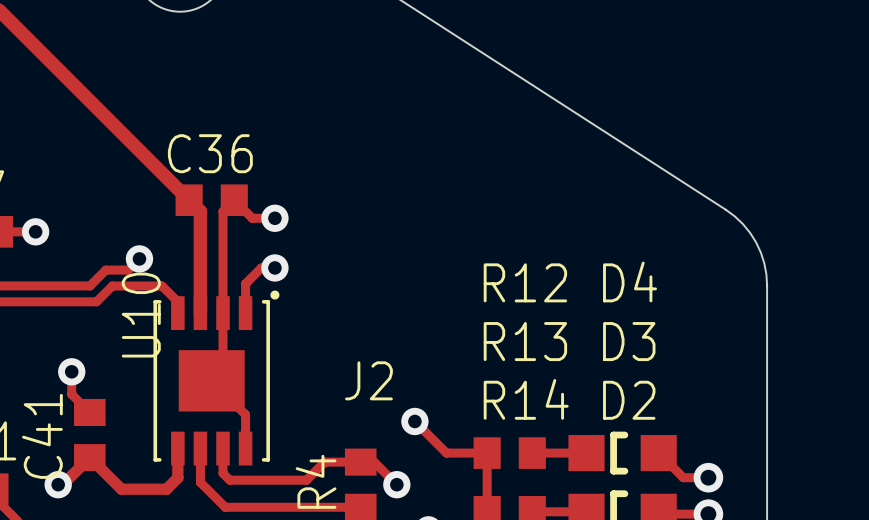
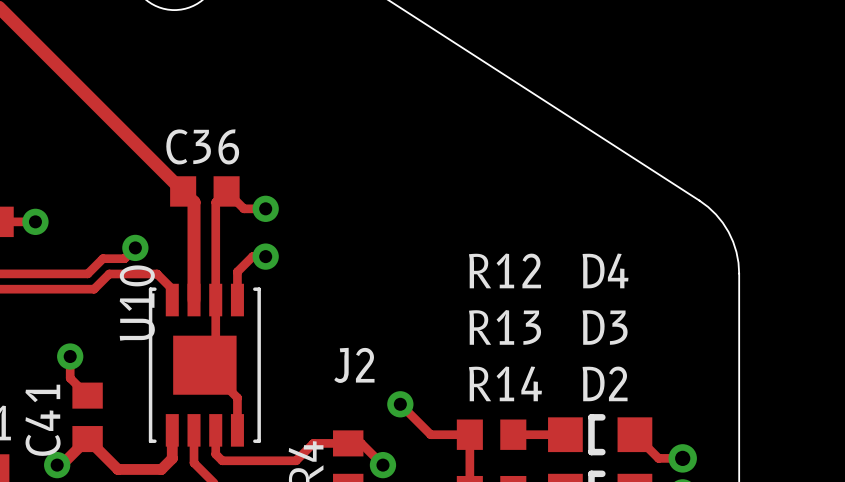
U10 footprint: [153, 290, 280, 466] -> [148, 283, 261, 447]

